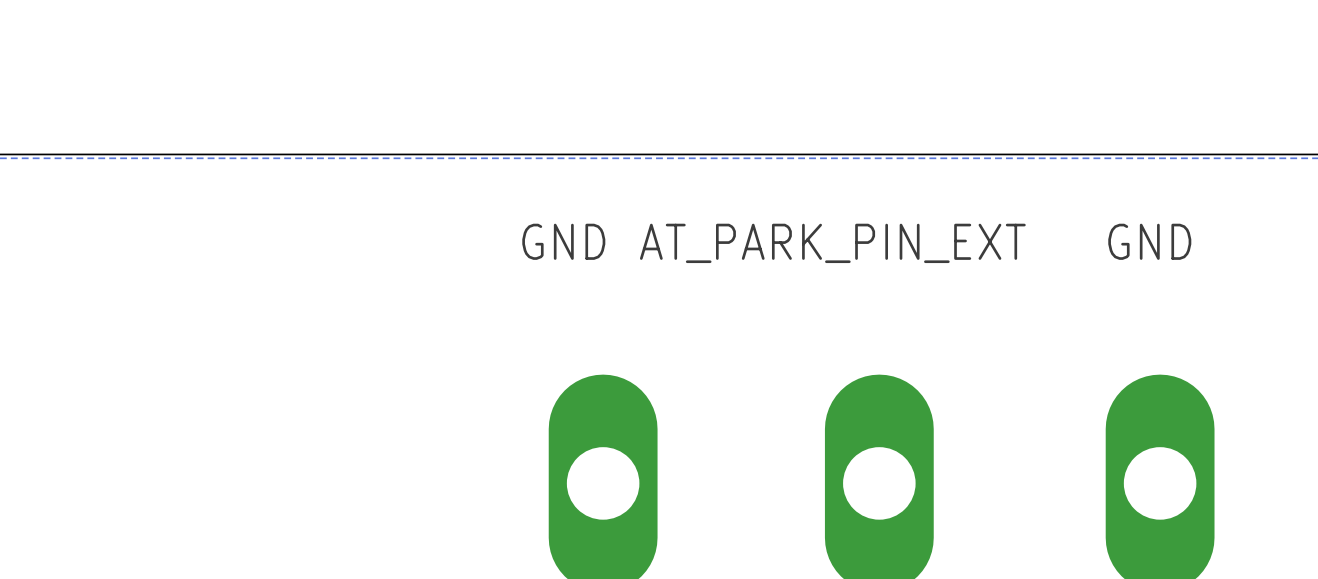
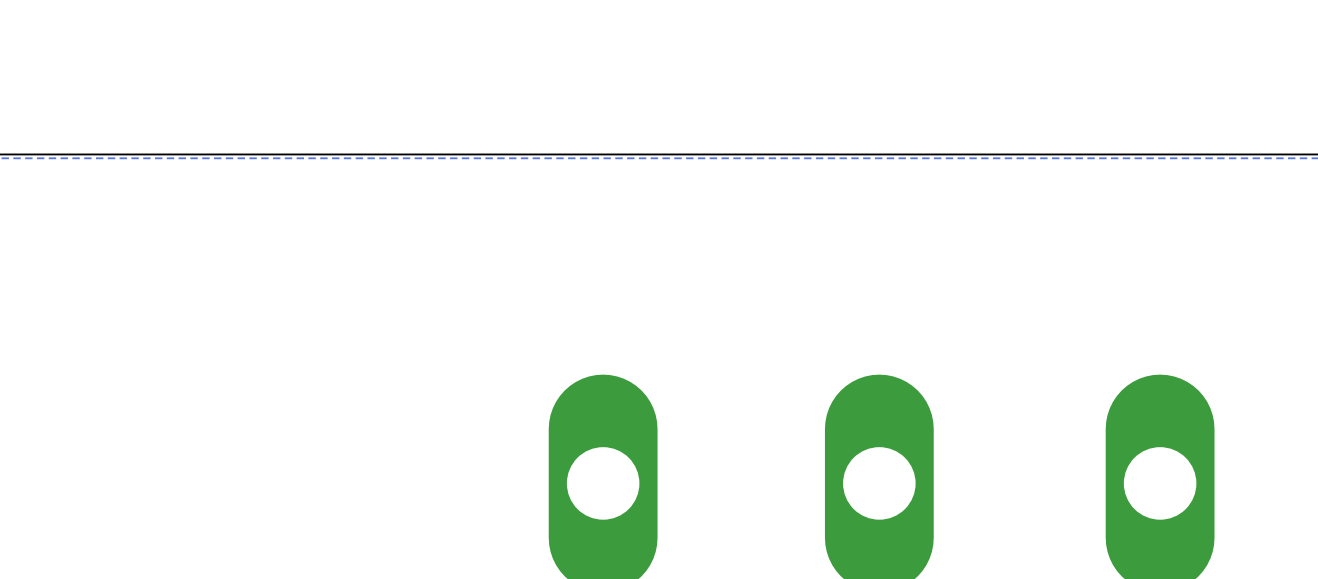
text: GND (563, 241) -> none
text: GND (1149, 241) -> none
text: AT_PARK_PIN_EXT (832, 243) -> none

